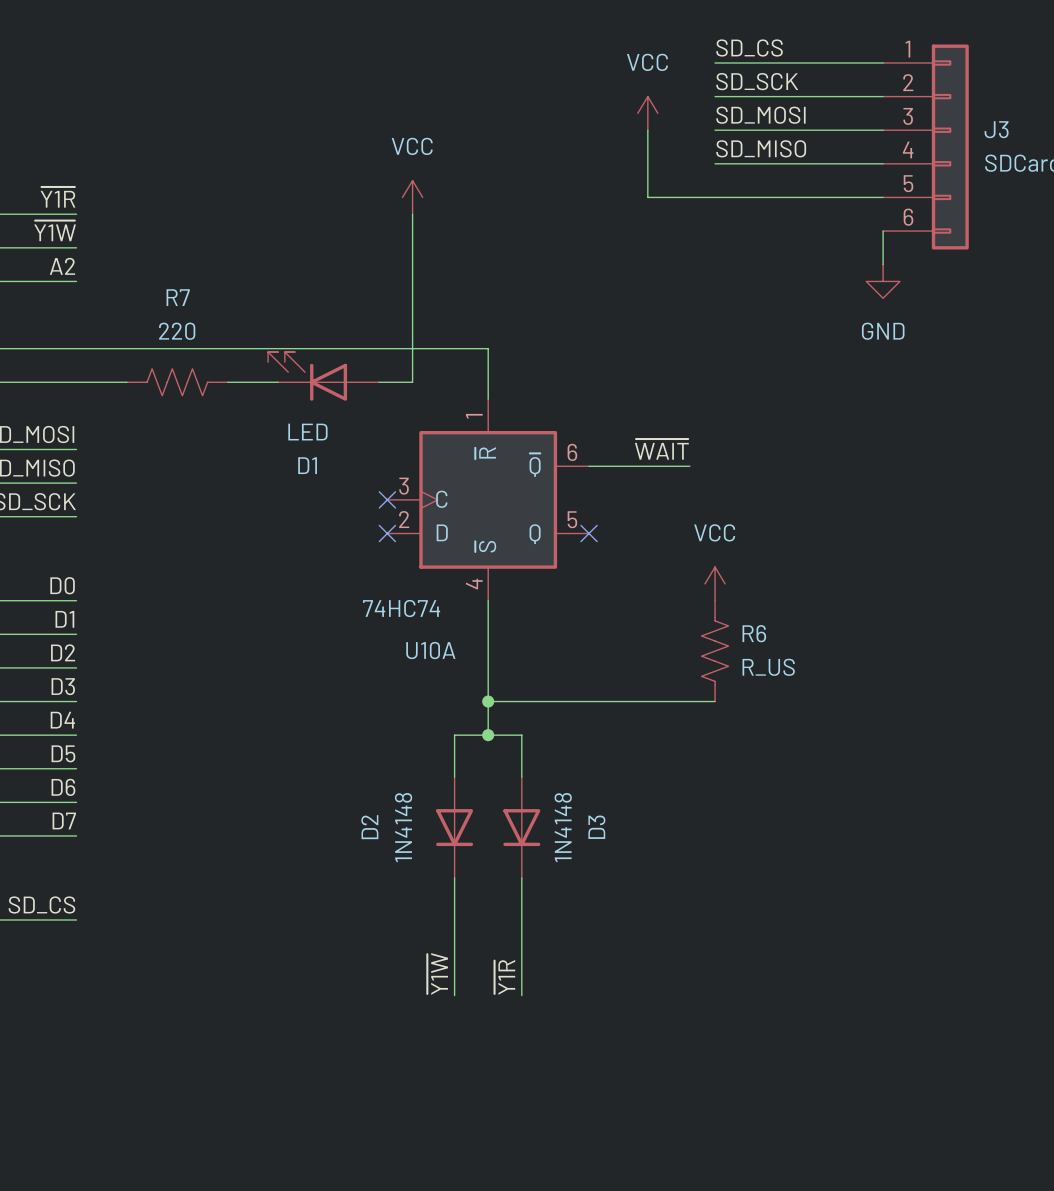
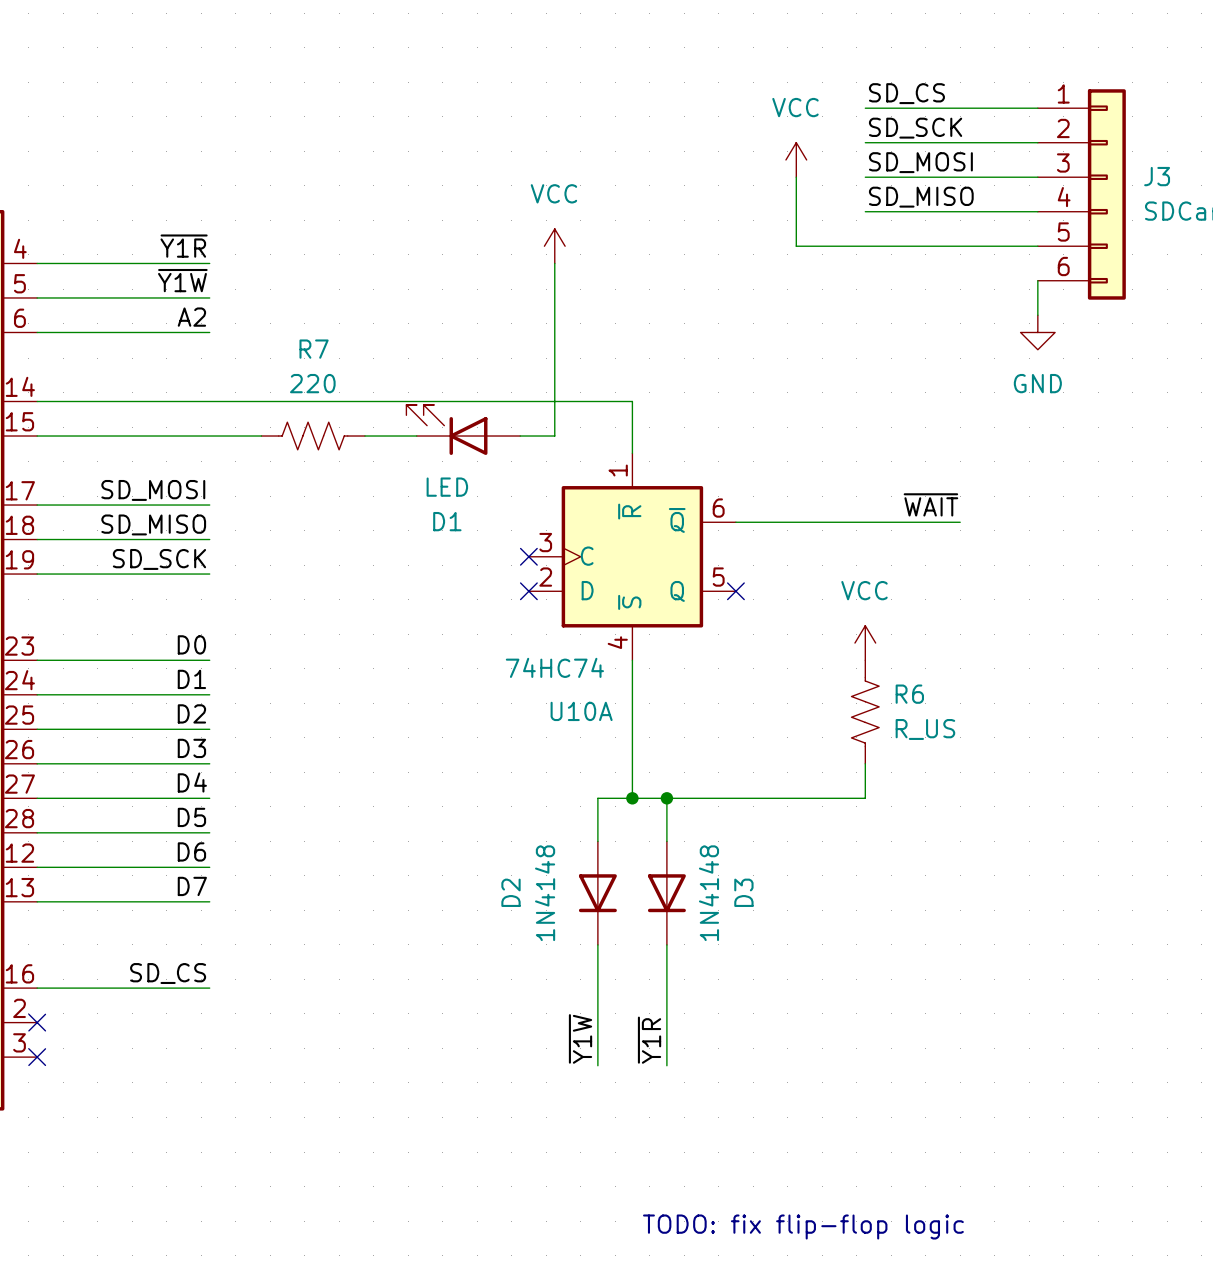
label position: ~{WAIT} (661, 449) -> ~{WAIT} (930, 504)
wire: none -> (839, 522) (960, 522)
wire: (488, 701) (715, 701) -> (666, 798) (865, 798) (865, 763)
junction position: (488, 701) -> (666, 798)
text: none -> TODO: fix flip-flop logic (803, 1227)

